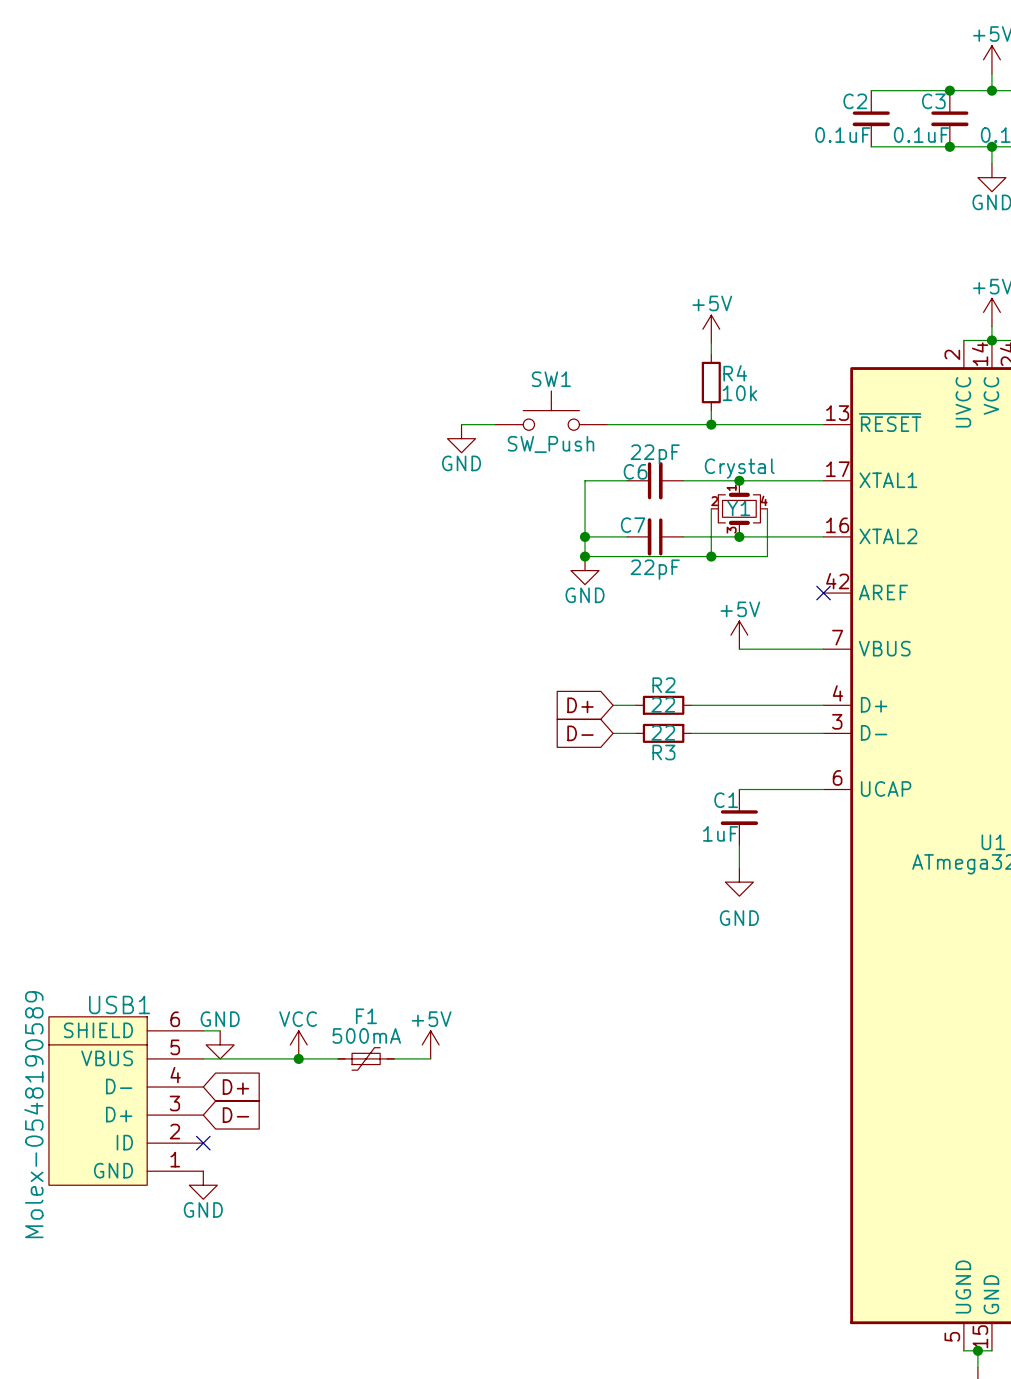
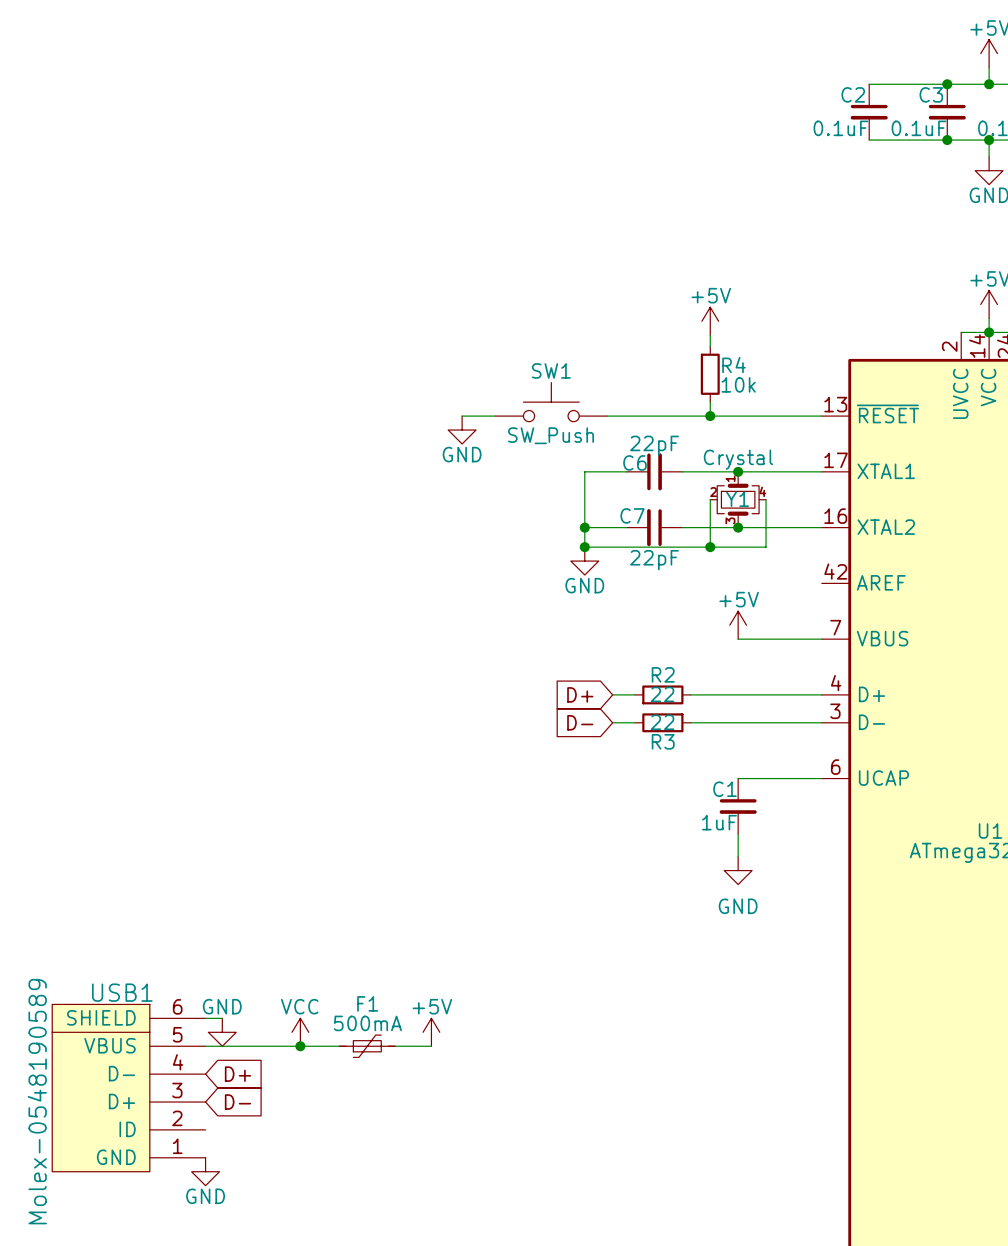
no-connect mark: (823, 593) -> none
no-connect mark: (203, 1143) -> none

